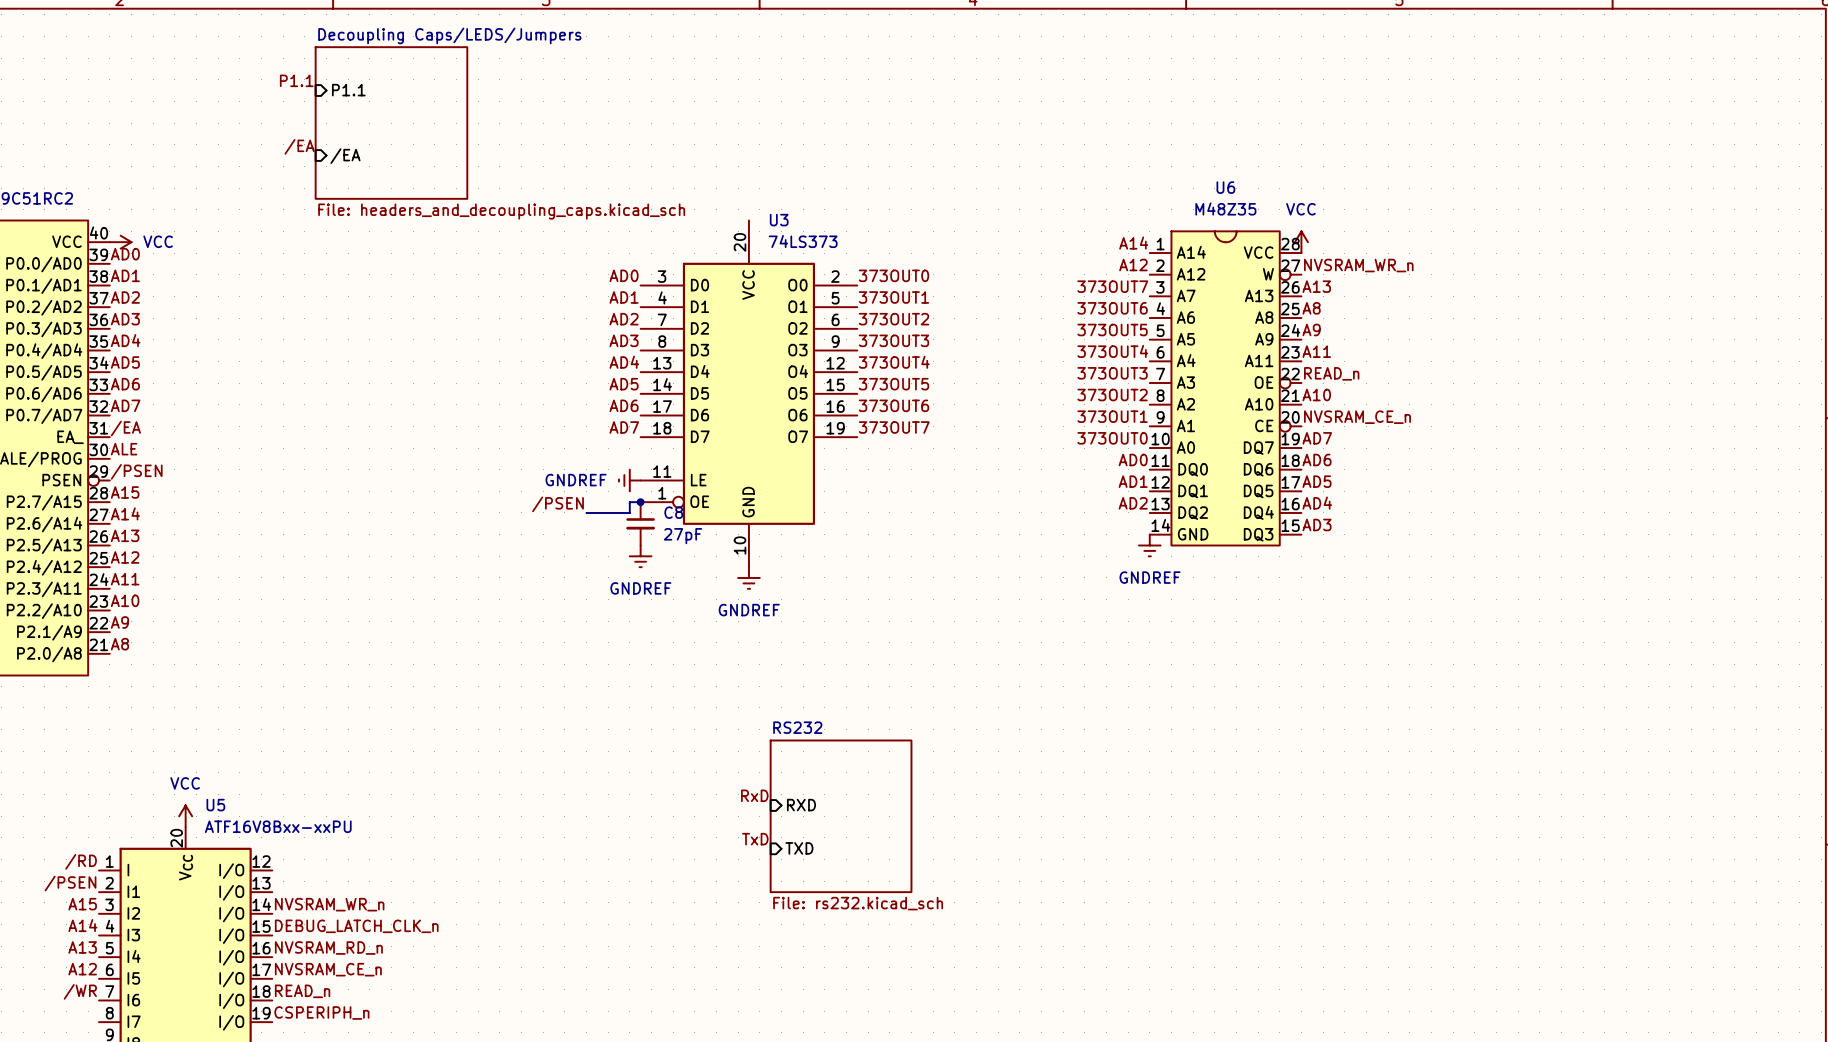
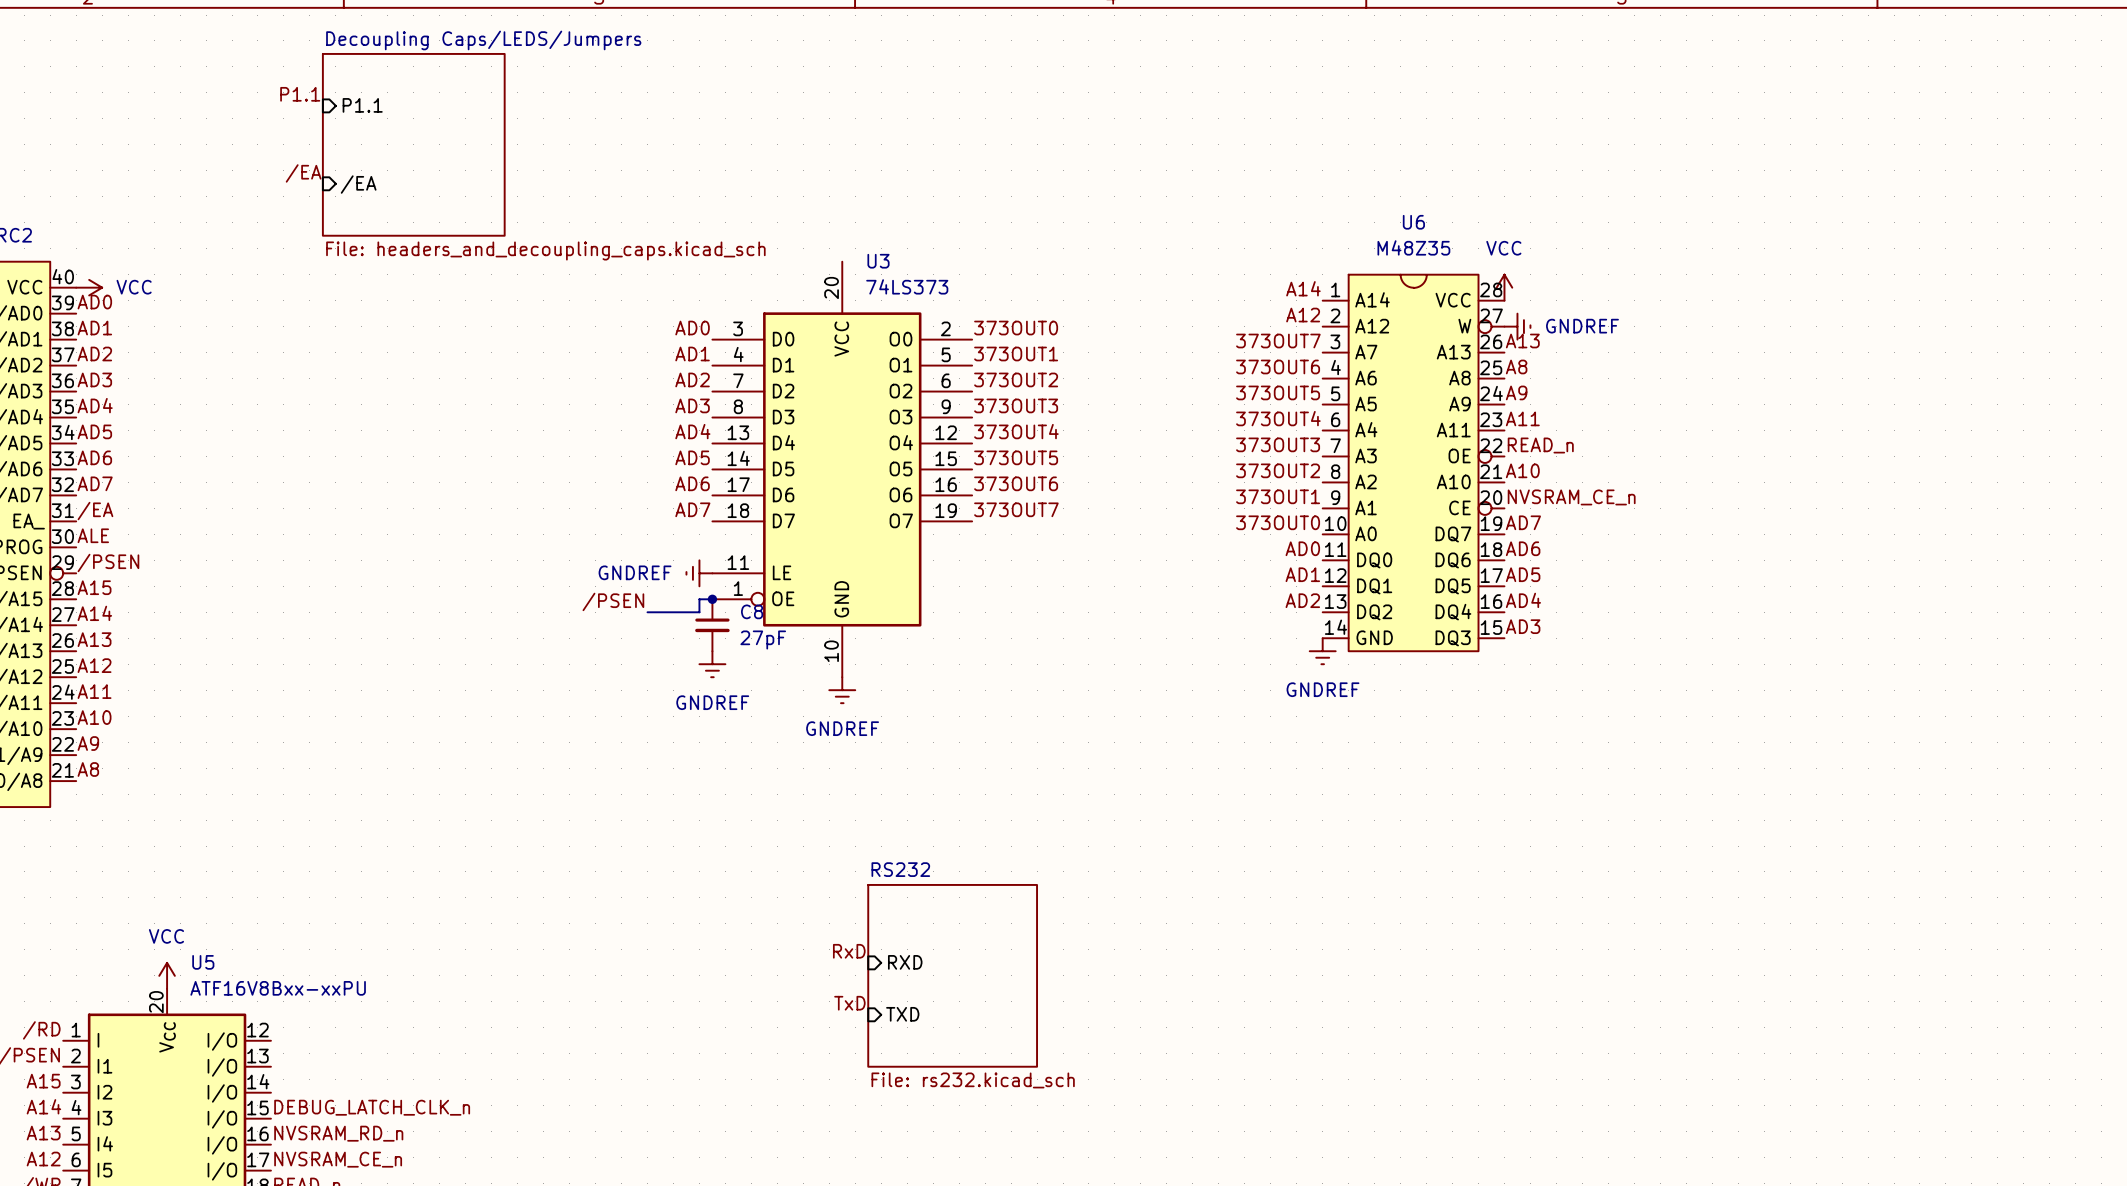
label: NVSRAM_WR_n (1358, 265) -> none
power symbol: none -> GNDREF (1517, 326)
label: NVSRAM_WR_n (329, 904) -> none

